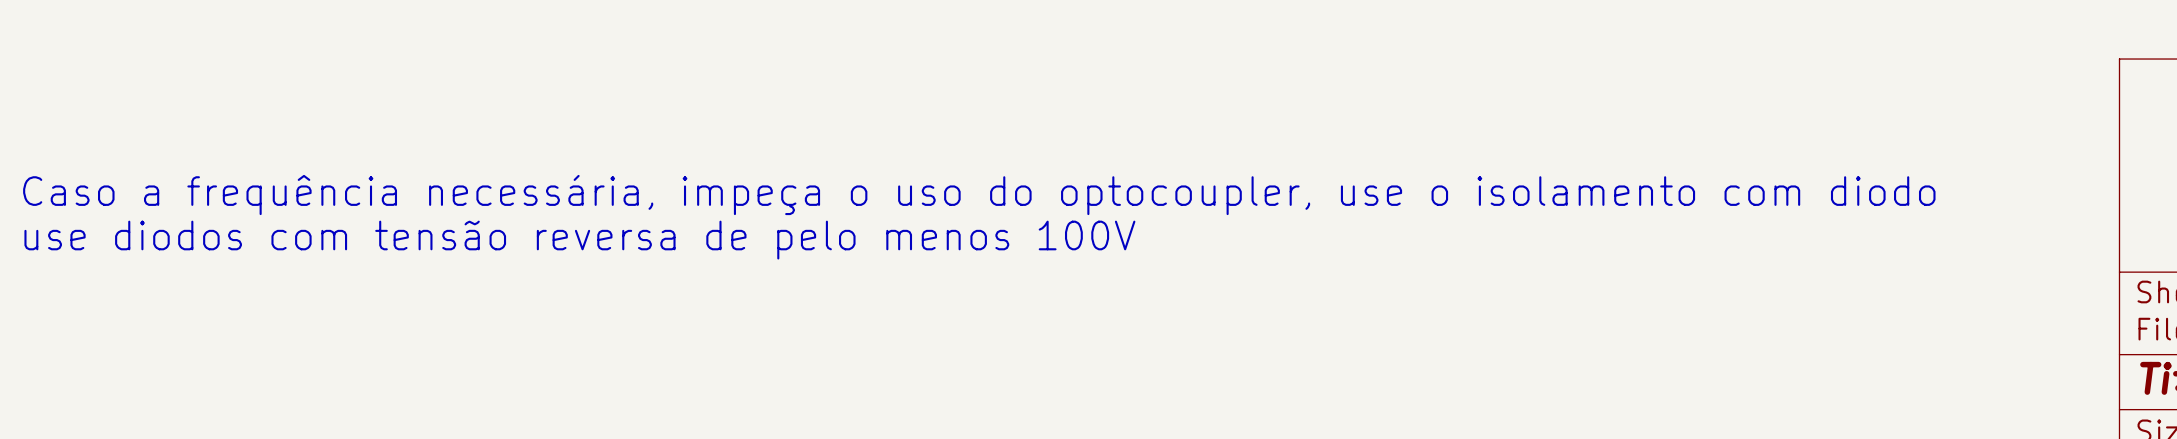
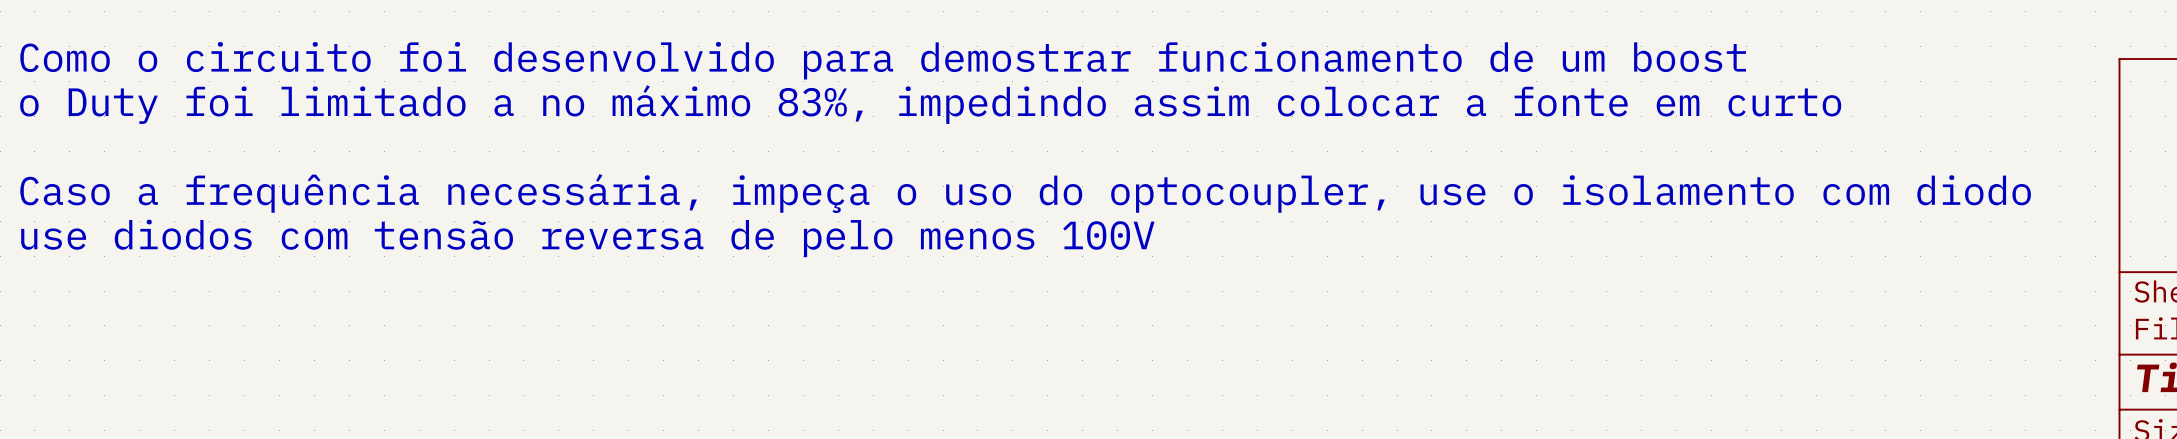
text: none -> Como o circuito foi desenvolvido para demostrar funcionamento de um boost (883, 60)
text: none -> o Duty foi limitado a no máximo 83%, impedindo assim colocar a fonte em curto (930, 104)

